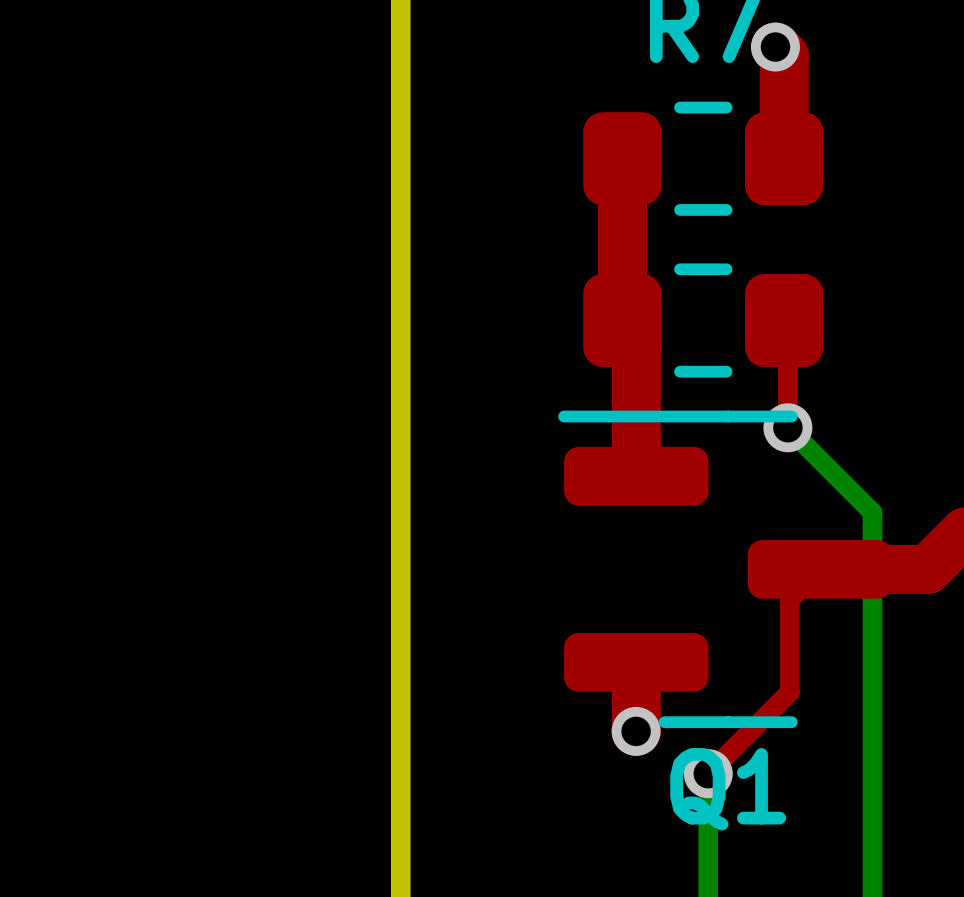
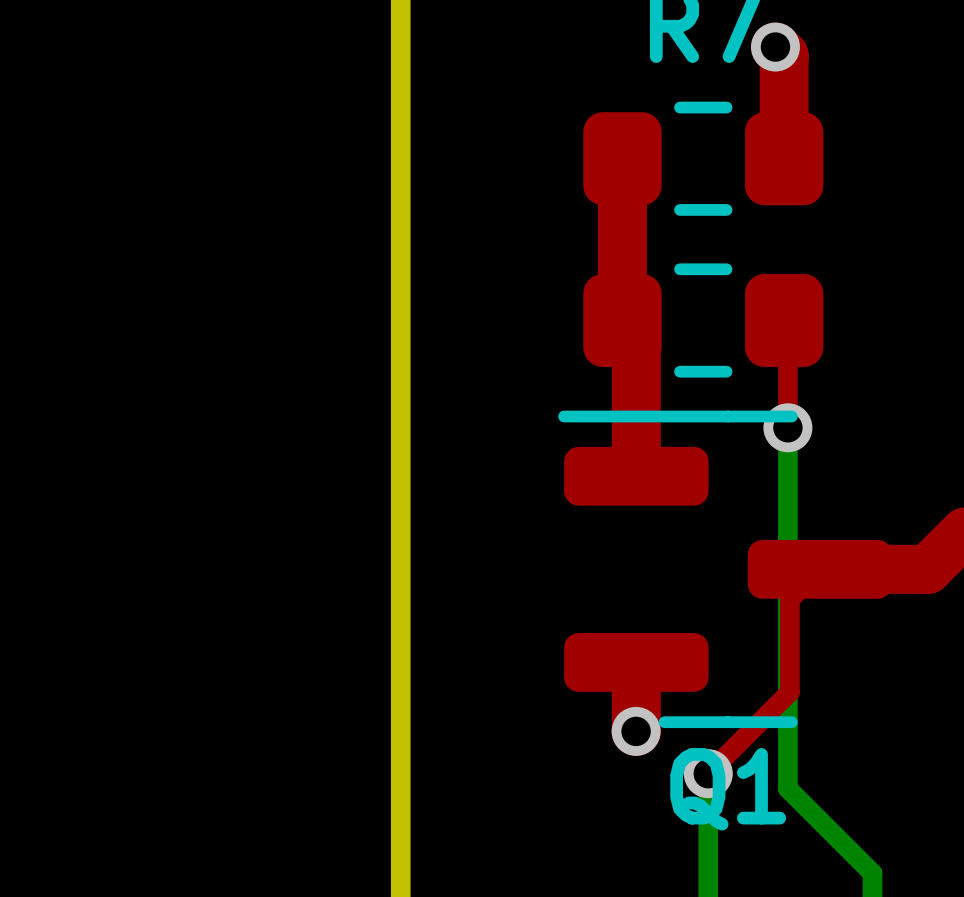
bottom track: (787, 427) (872, 512) (872, 873) -> (787, 427) (787, 788) (872, 873)

